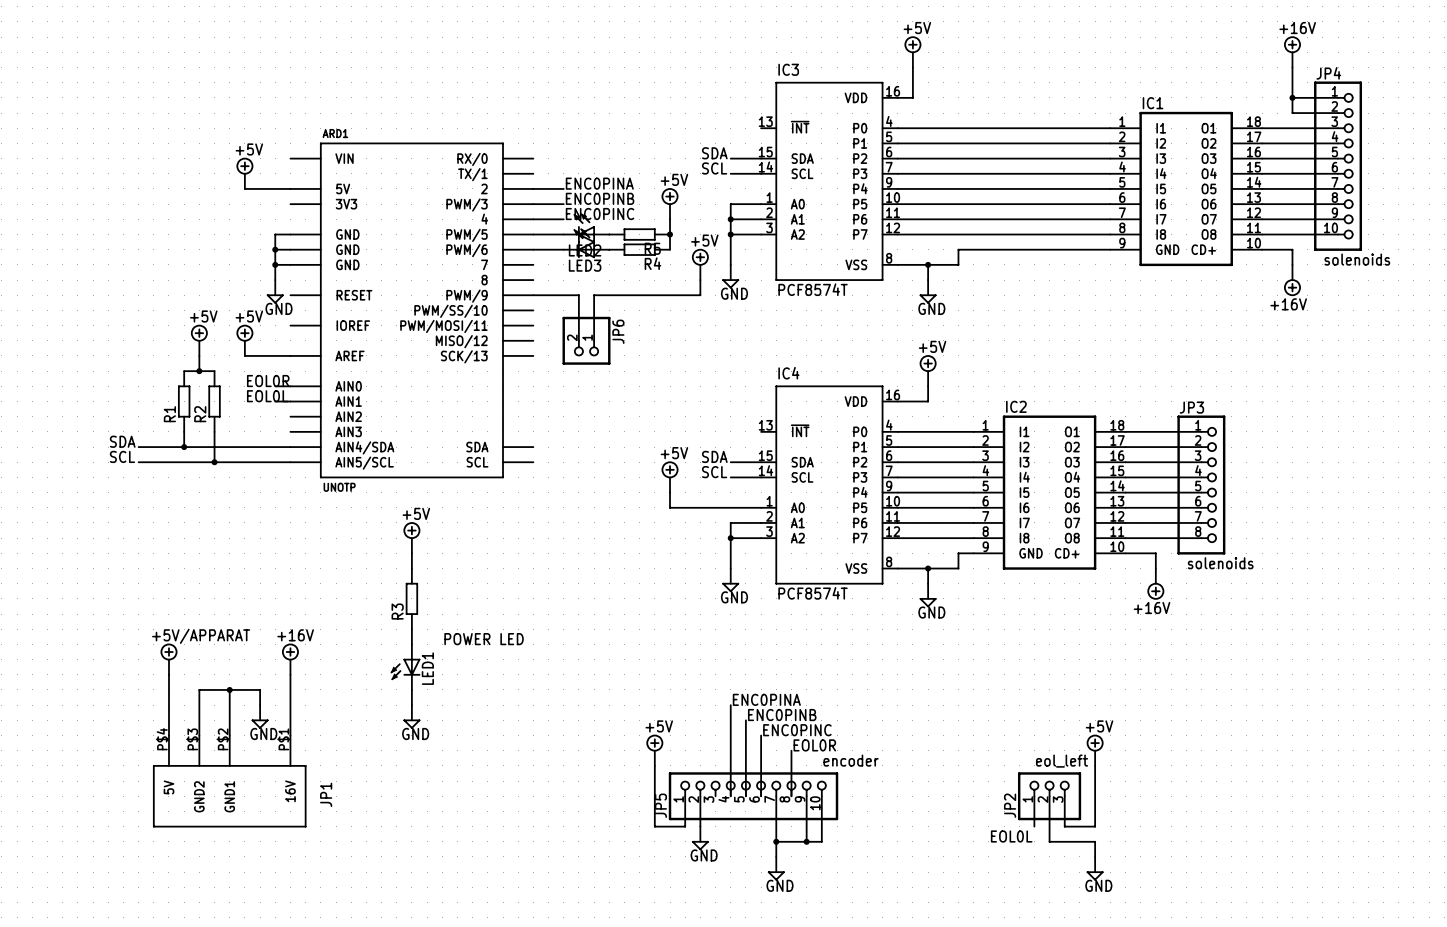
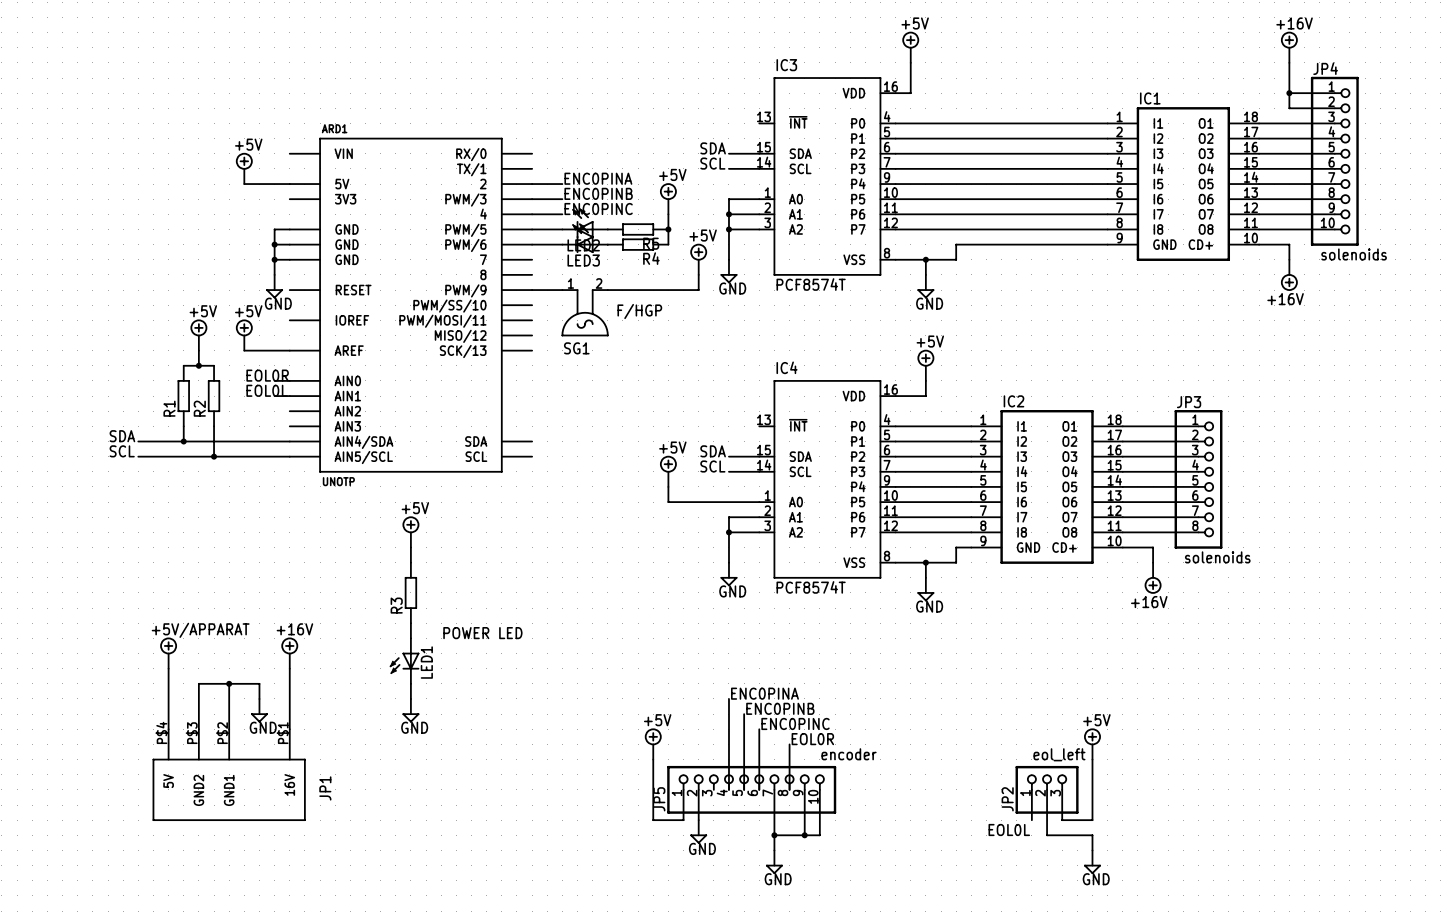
SG1: none -> F/HGP (585, 312)
JP6: (586, 340) -> none

